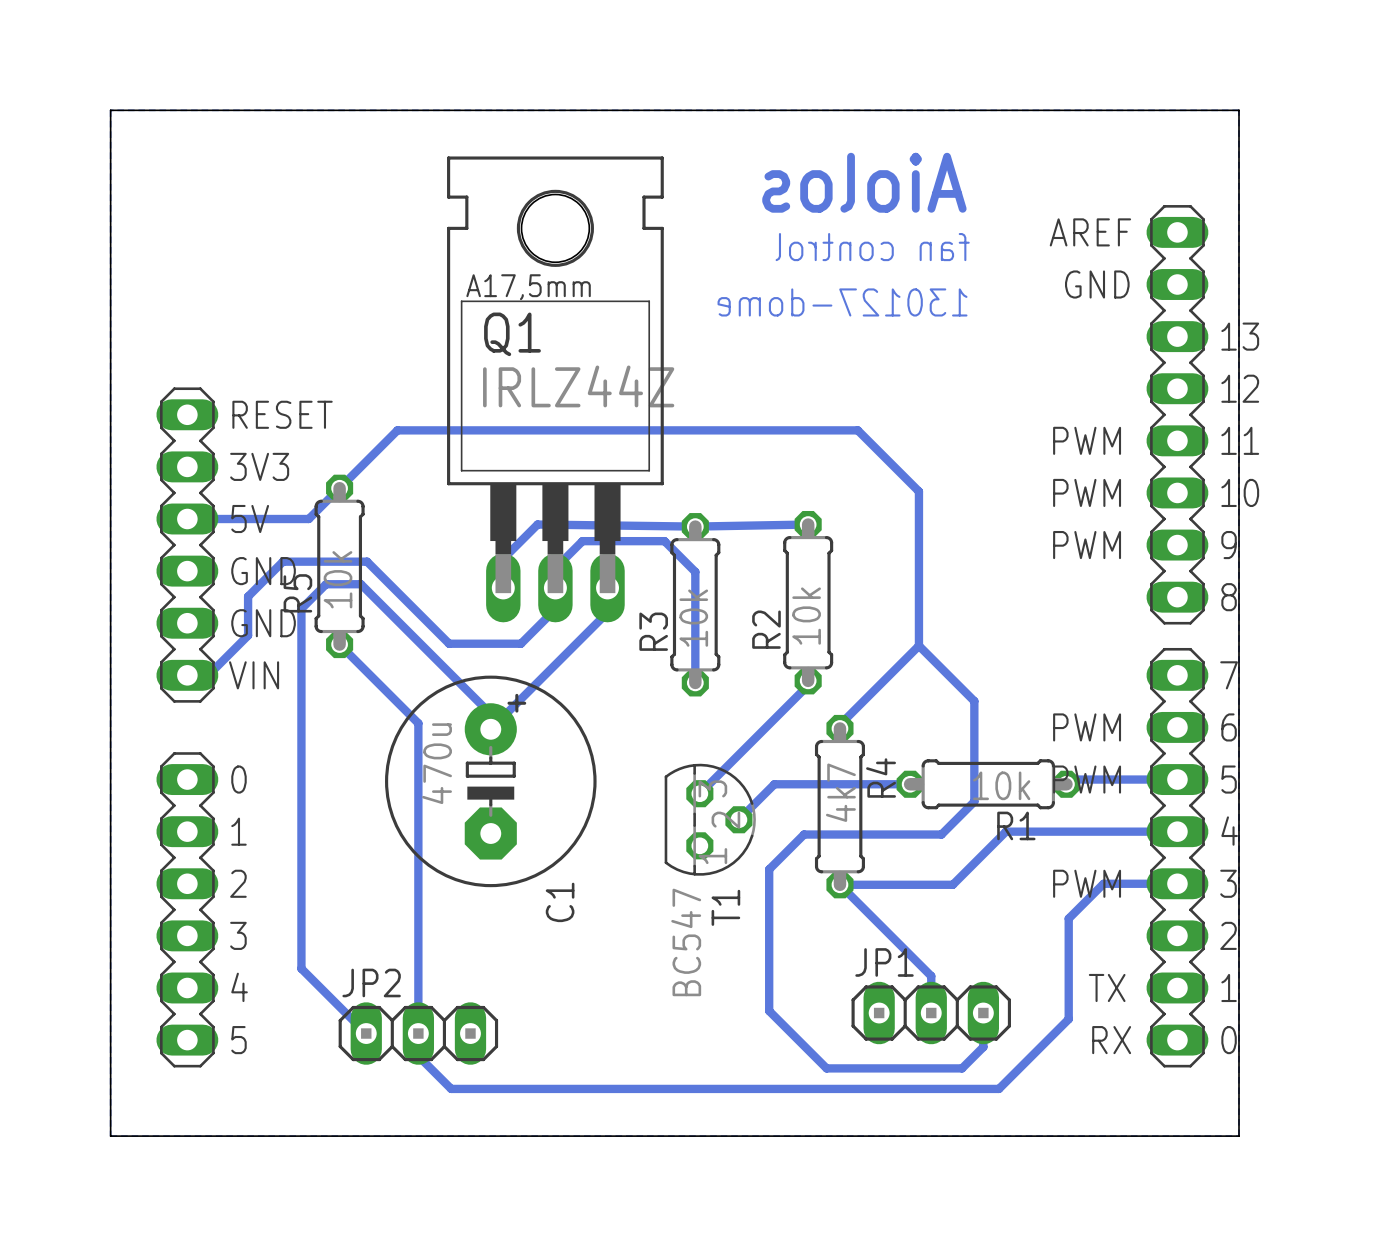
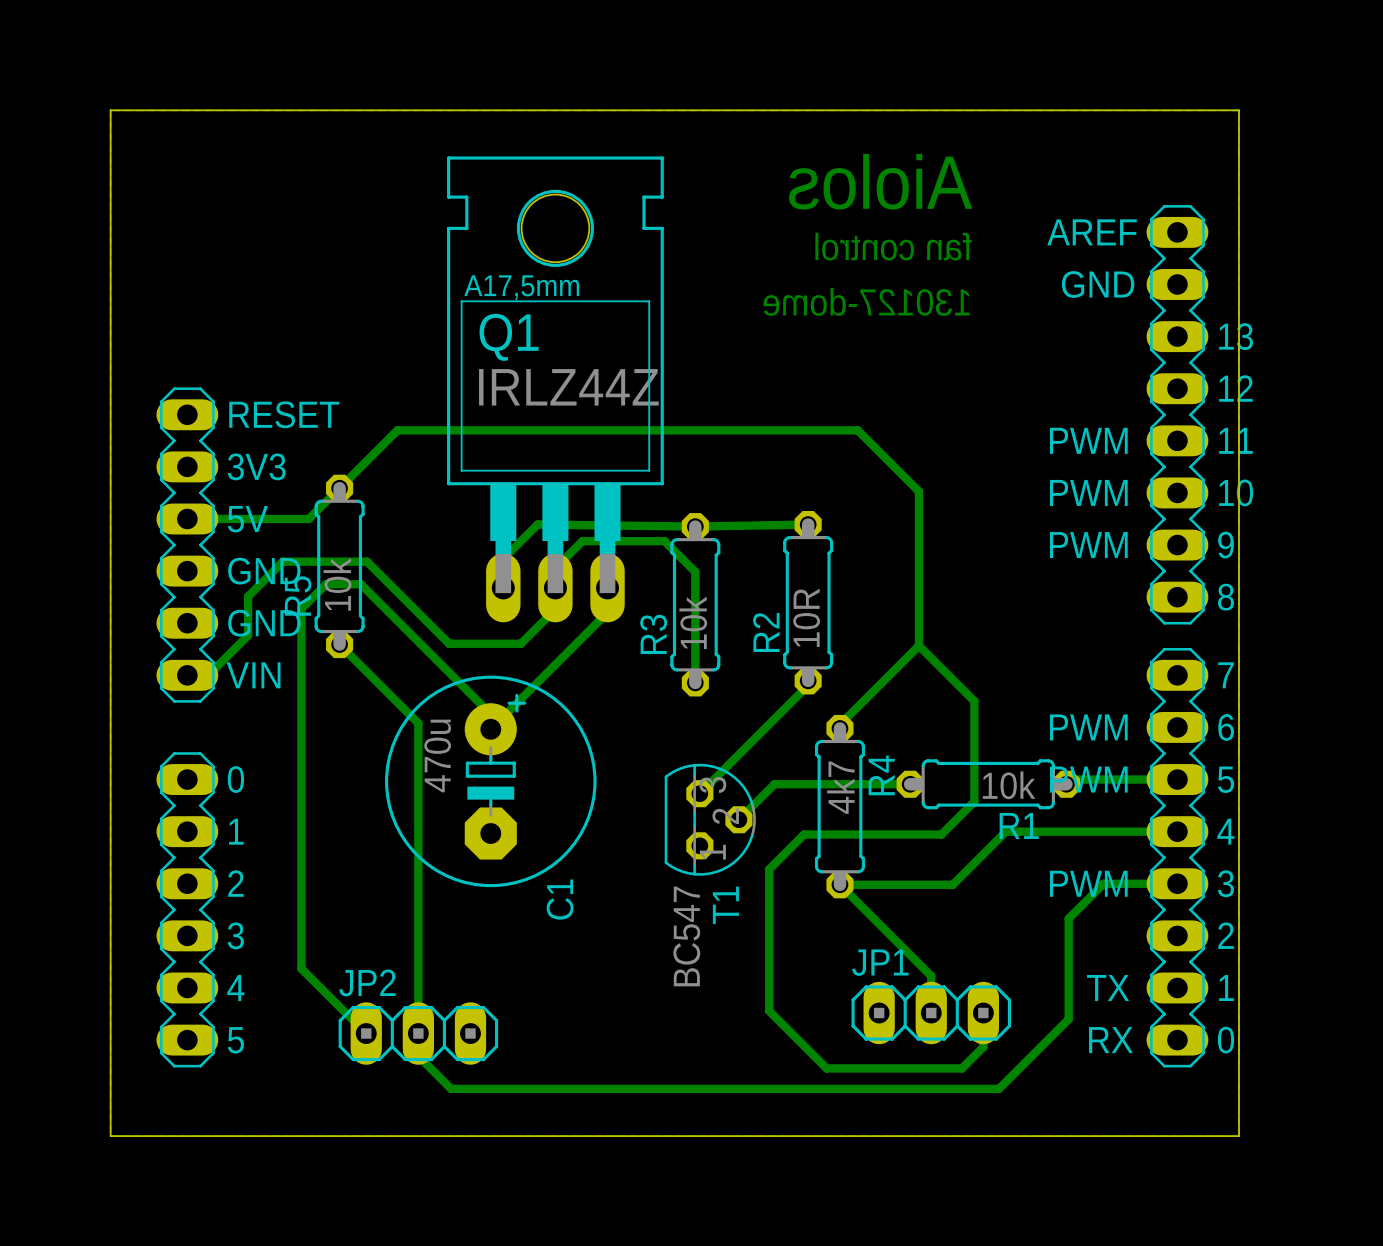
R2 value: 10k (806, 616) -> 10R (806, 617)

